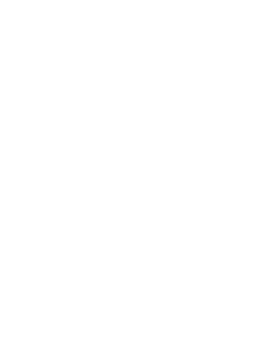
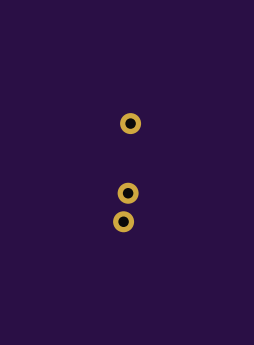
via: none -> (130, 123)
via: none -> (128, 193)
via: none -> (123, 221)

